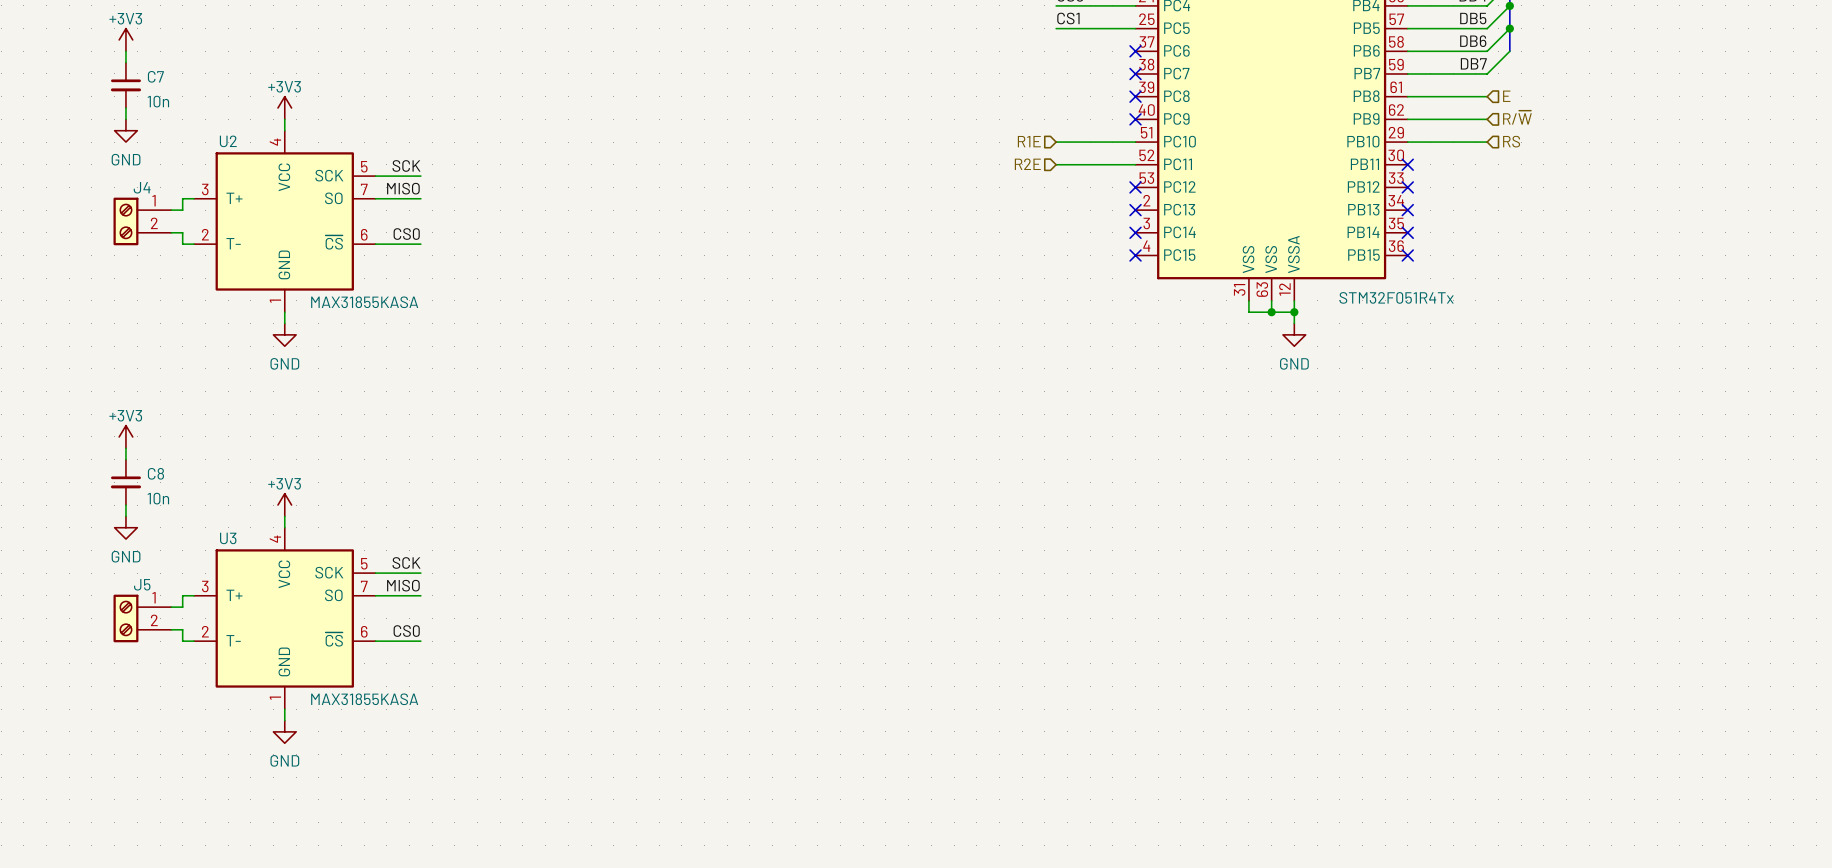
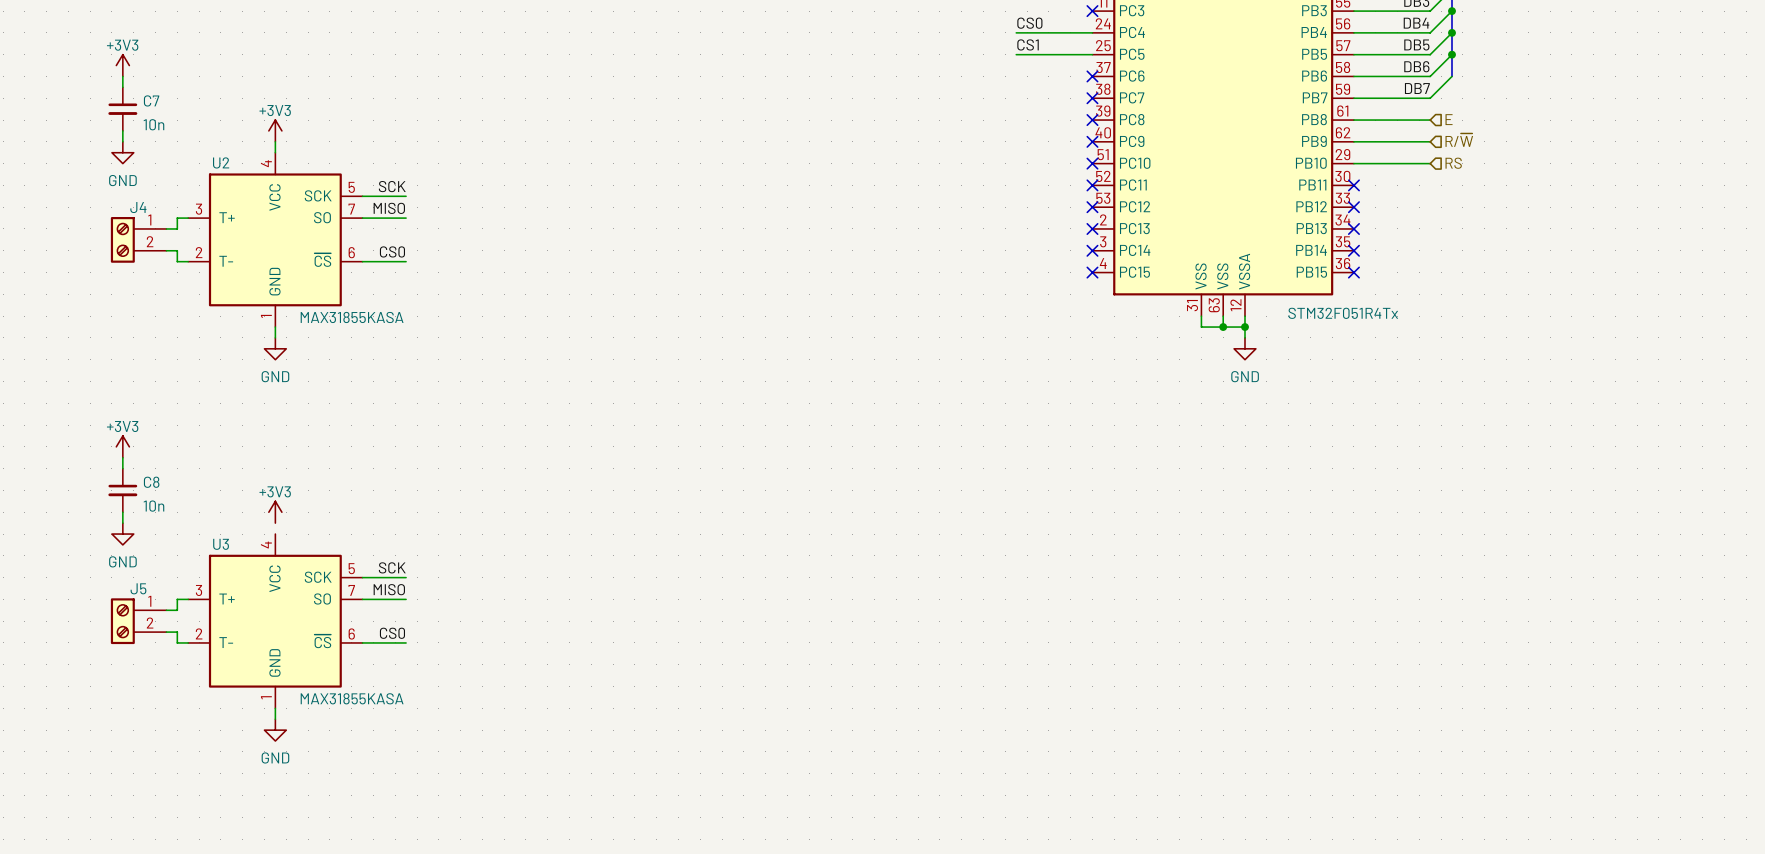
hierarchical label: R1E (1029, 141) -> none
wire: (1056, 142) (1135, 142) -> none
no-connect mark: none -> (1092, 163)
hierarchical label: R2E (1027, 164) -> none
wire: (1056, 164) (1135, 164) -> none
no-connect mark: none -> (1092, 185)
wire: (284, 516) (284, 527) -> none

